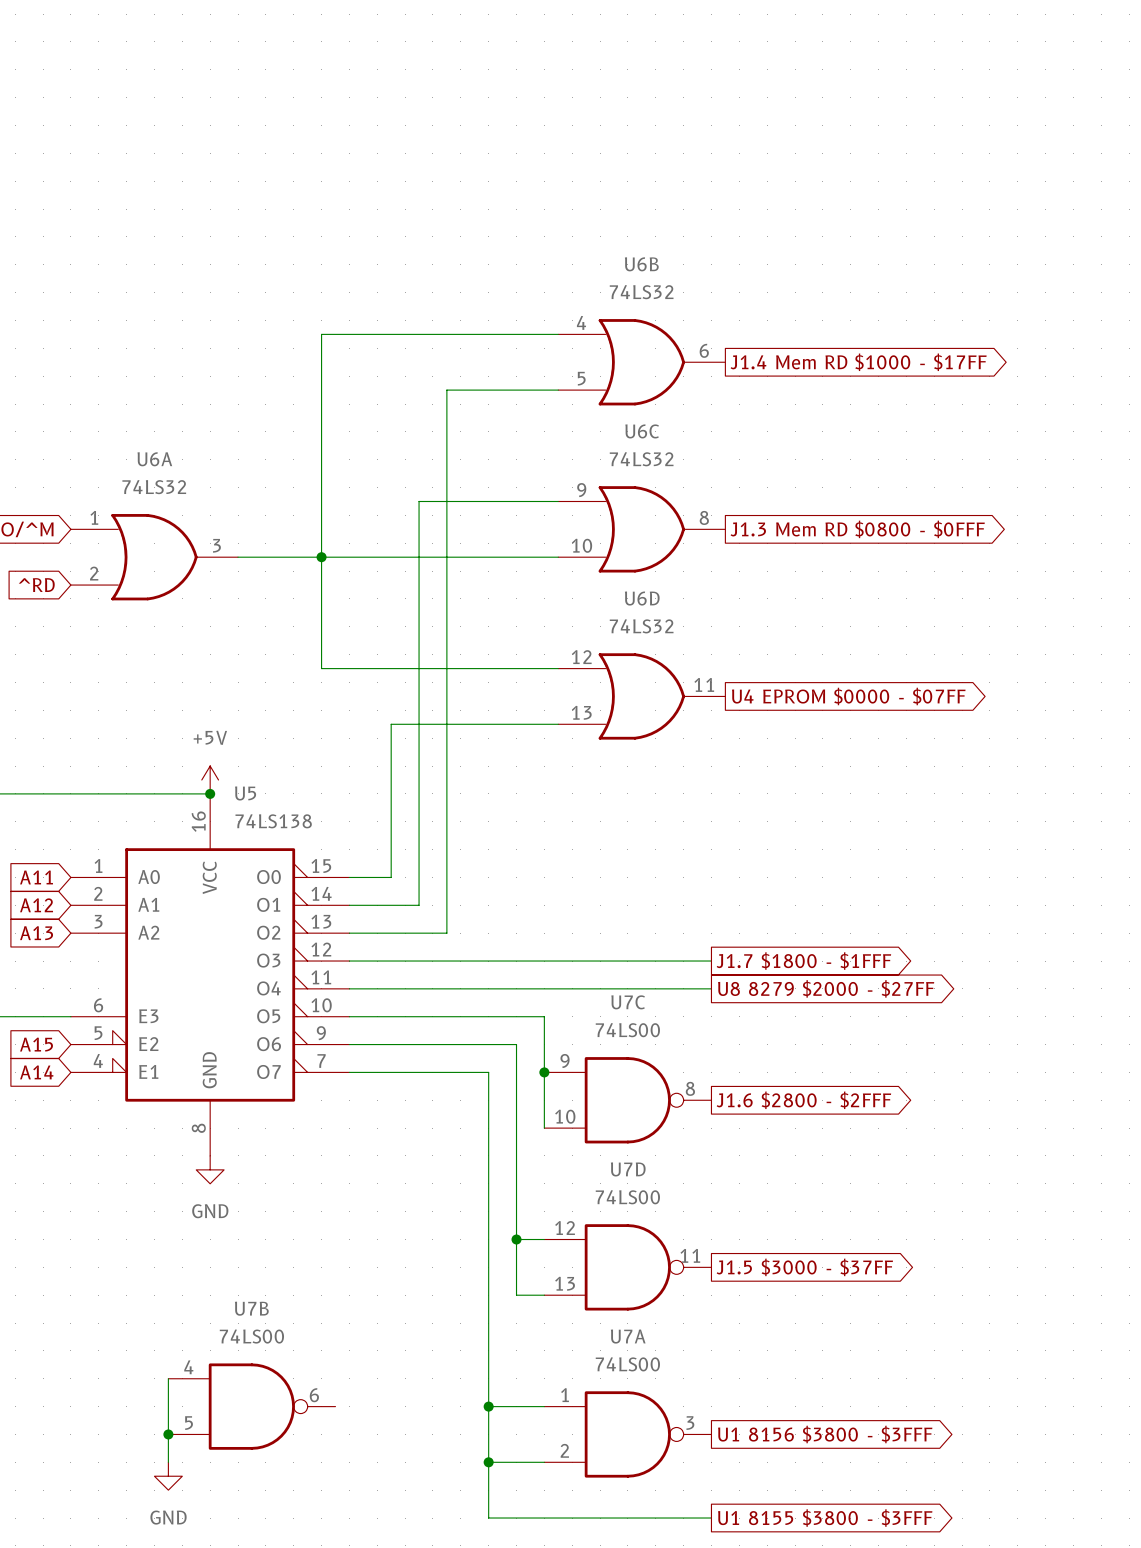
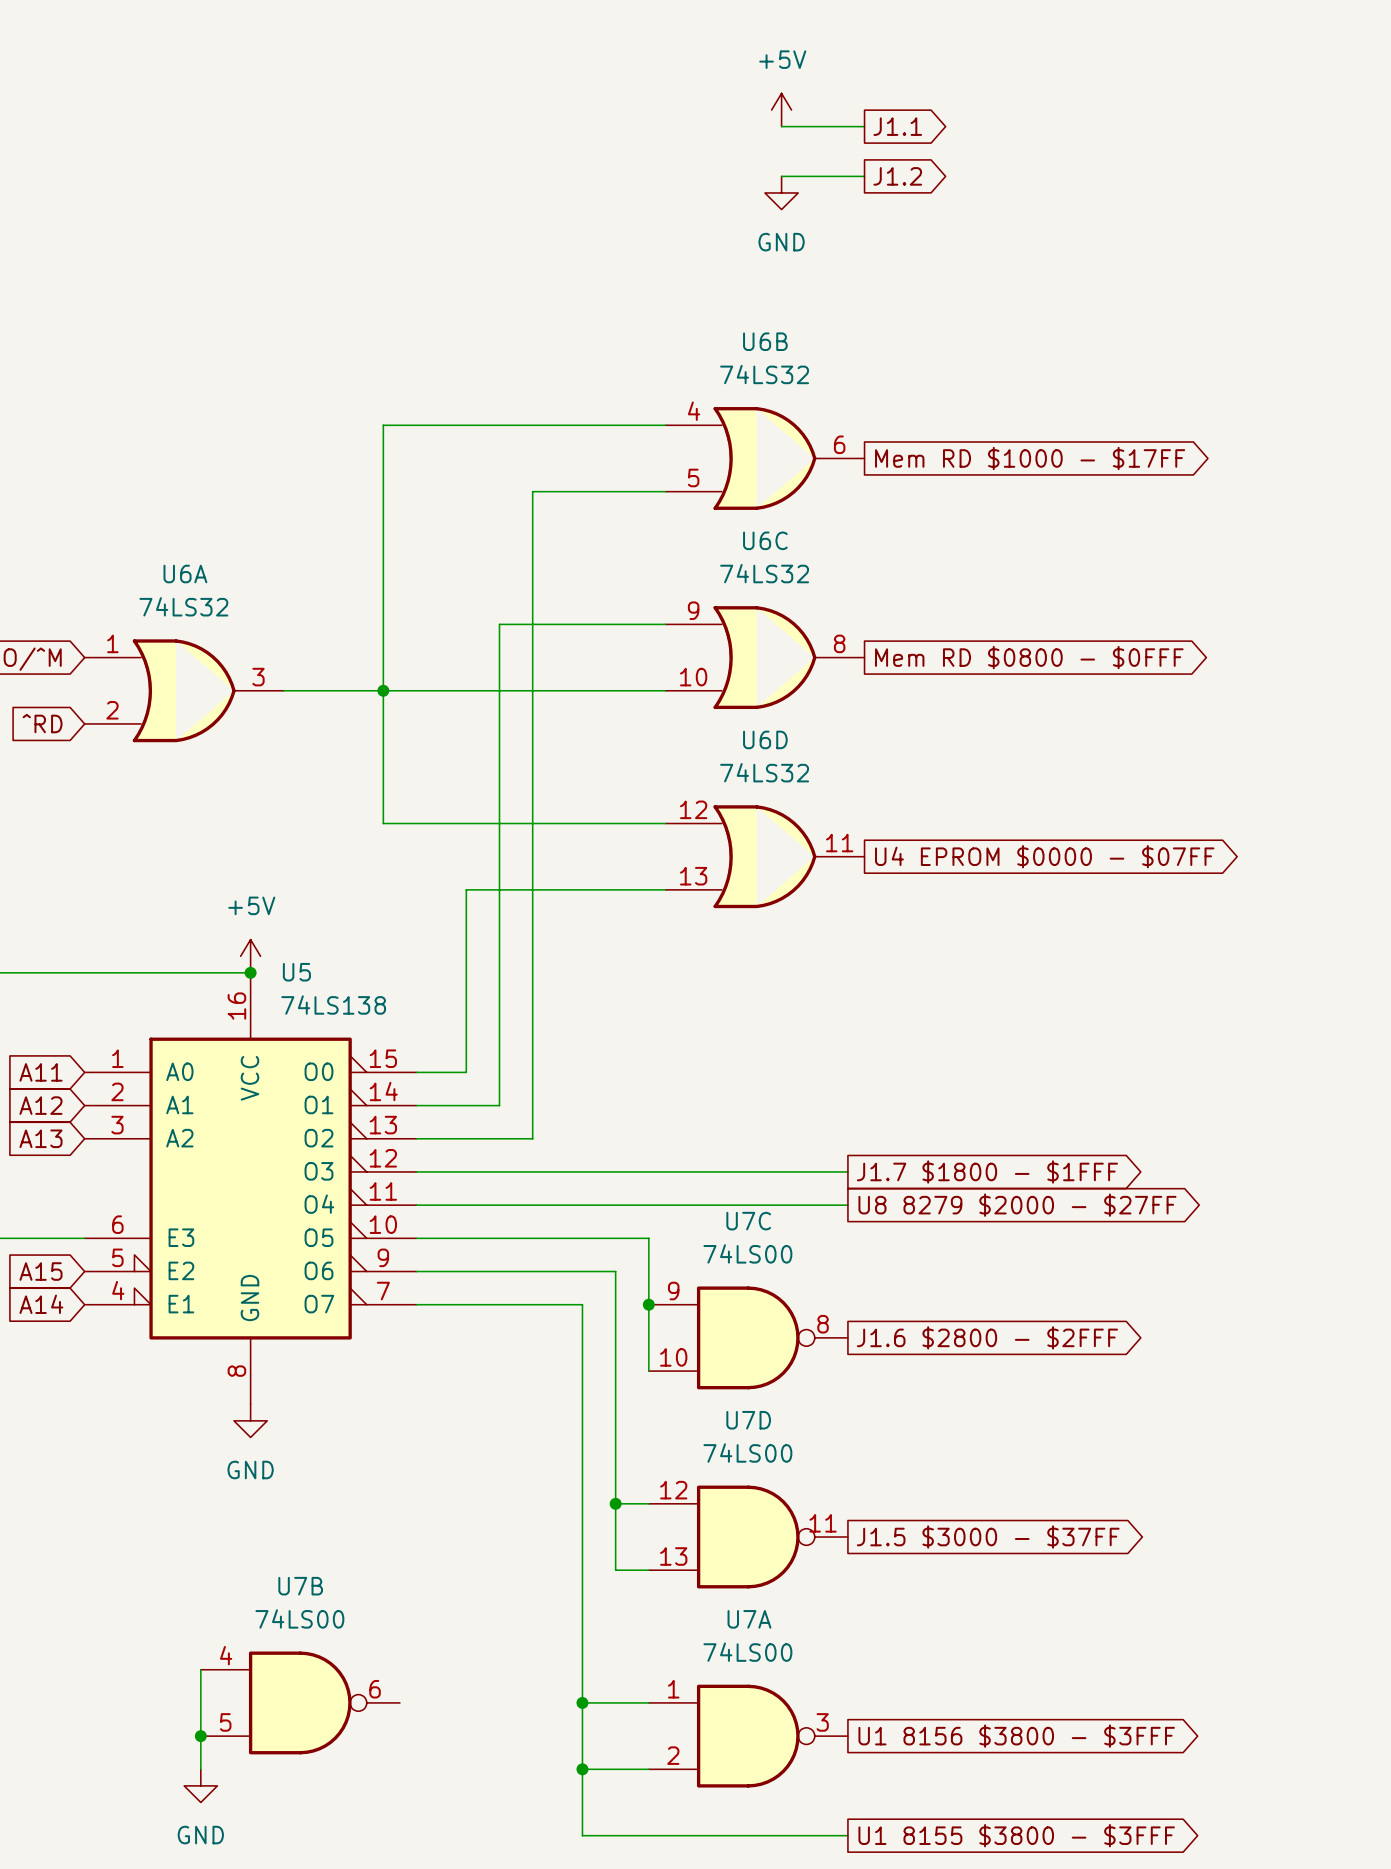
power symbol: none -> +5V (781, 110)
wire: none -> (781, 126) (864, 126)
global label: none -> J1.1 (897, 126)
wire: none -> (781, 176) (864, 176)
global label: none -> J1.2 (897, 176)
power symbol: none -> GND (781, 192)
global label: J1.4 Mem RD $1000 - $17FF (858, 362) -> Mem RD $1000 - $17FF (1030, 458)
global label: J1.3 Mem RD $0800 - $0FFF (857, 529) -> Mem RD $0800 - $0FFF (1029, 657)

